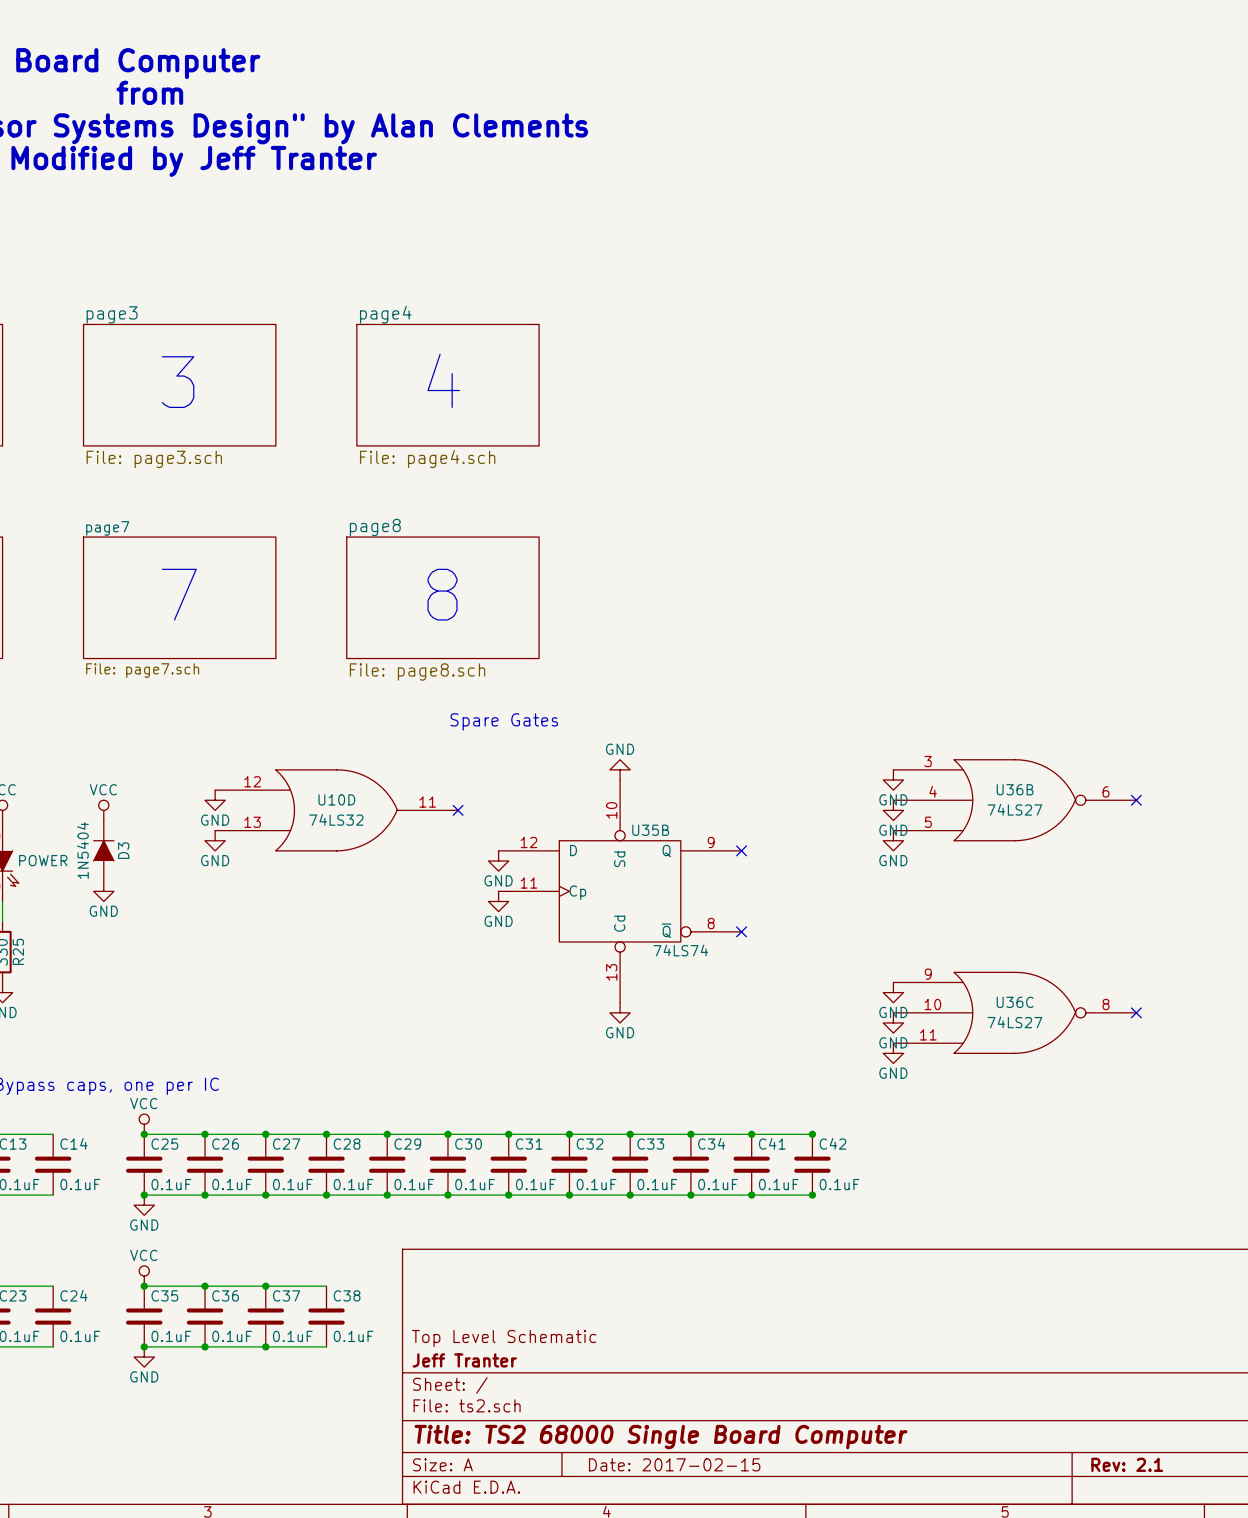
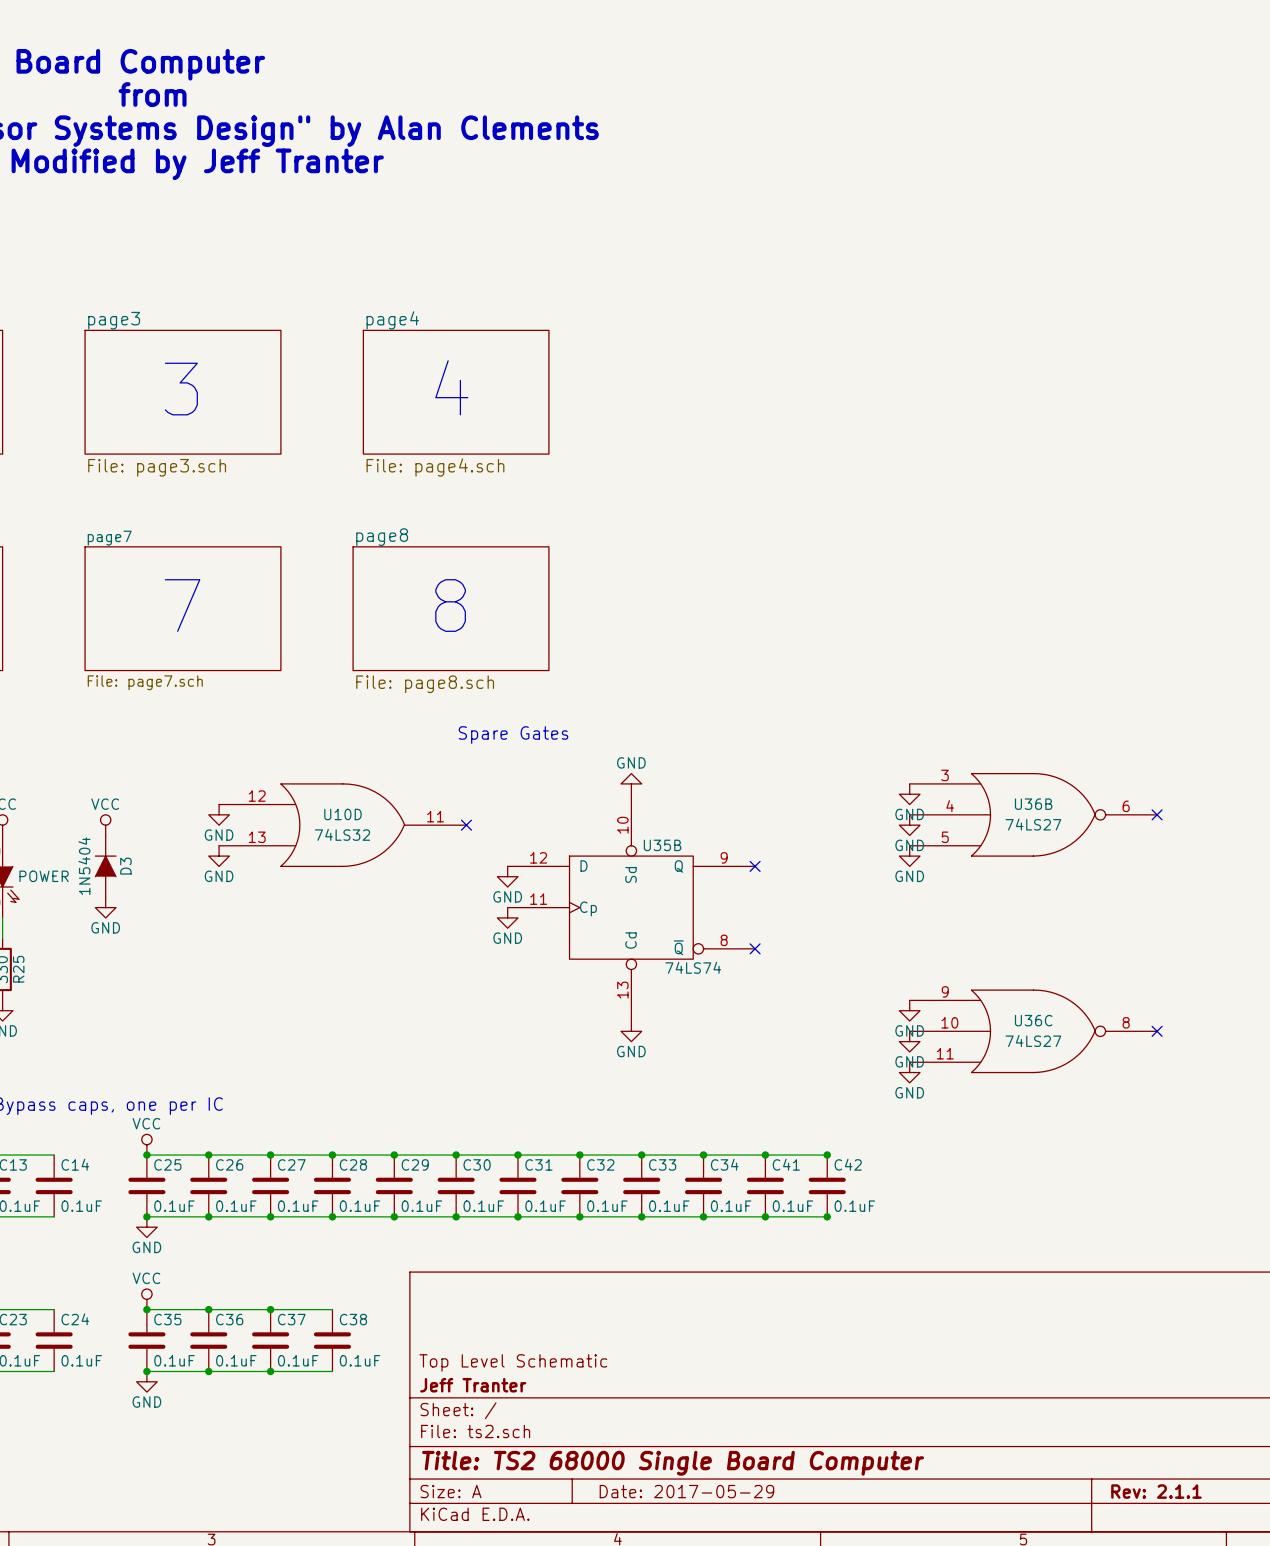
title block: Date: 2017-02-15 (674, 1464) -> Date: 2017-05-29 (686, 1491)
title block: Rev: 2.1 (1127, 1464) -> Rev: 2.1.1 (1156, 1491)

